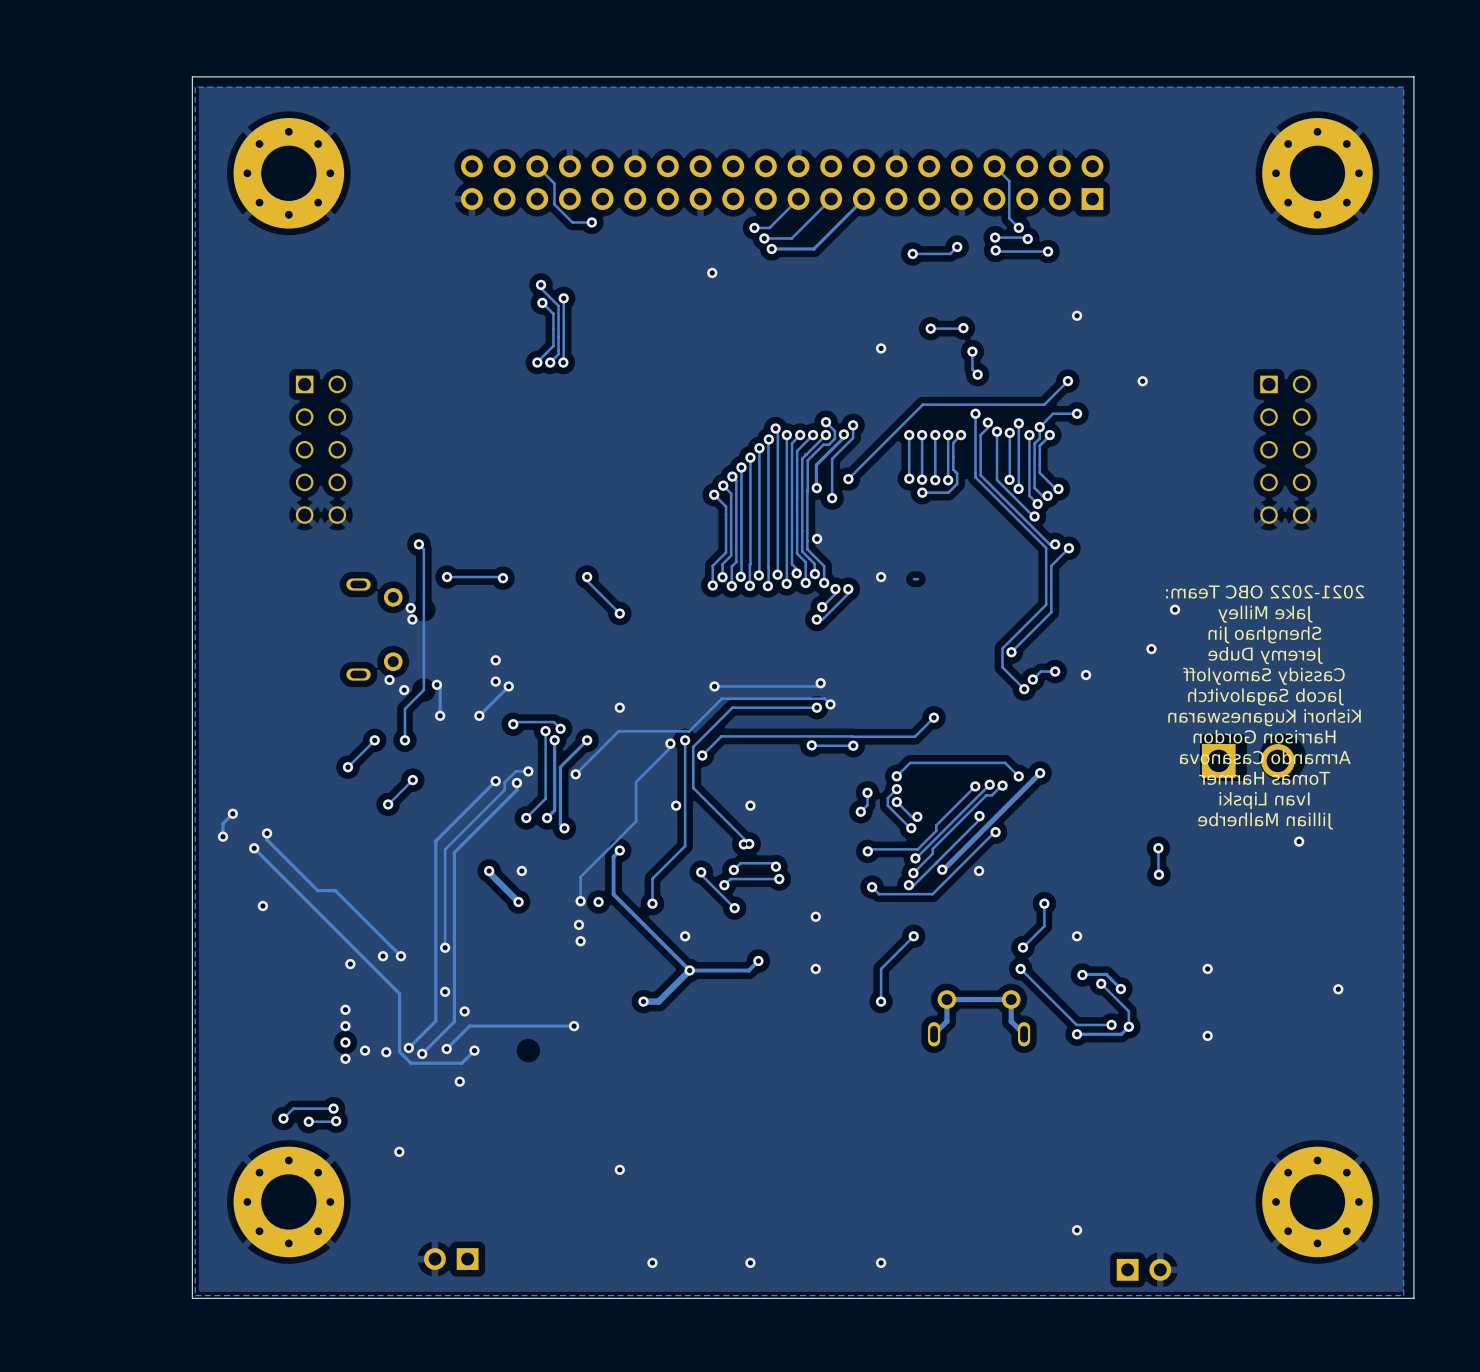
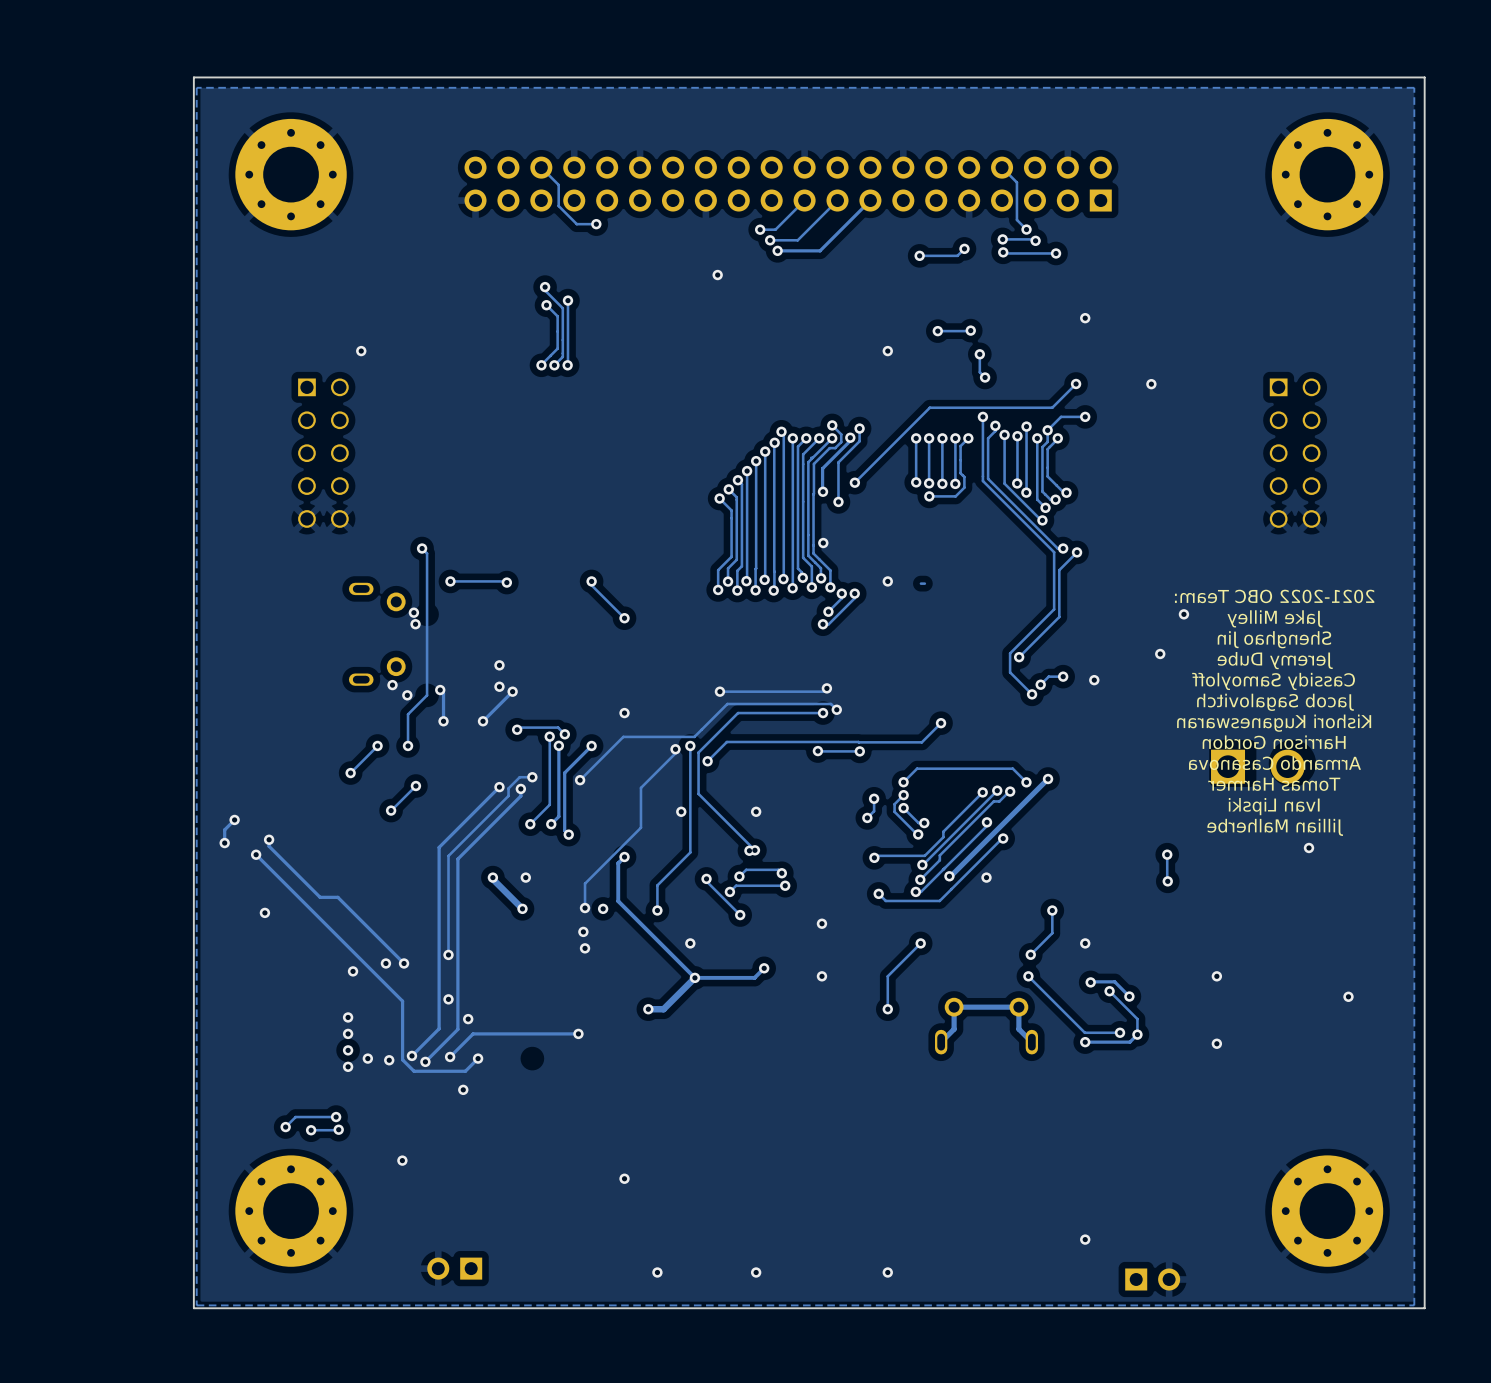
via: none -> (361, 351)

